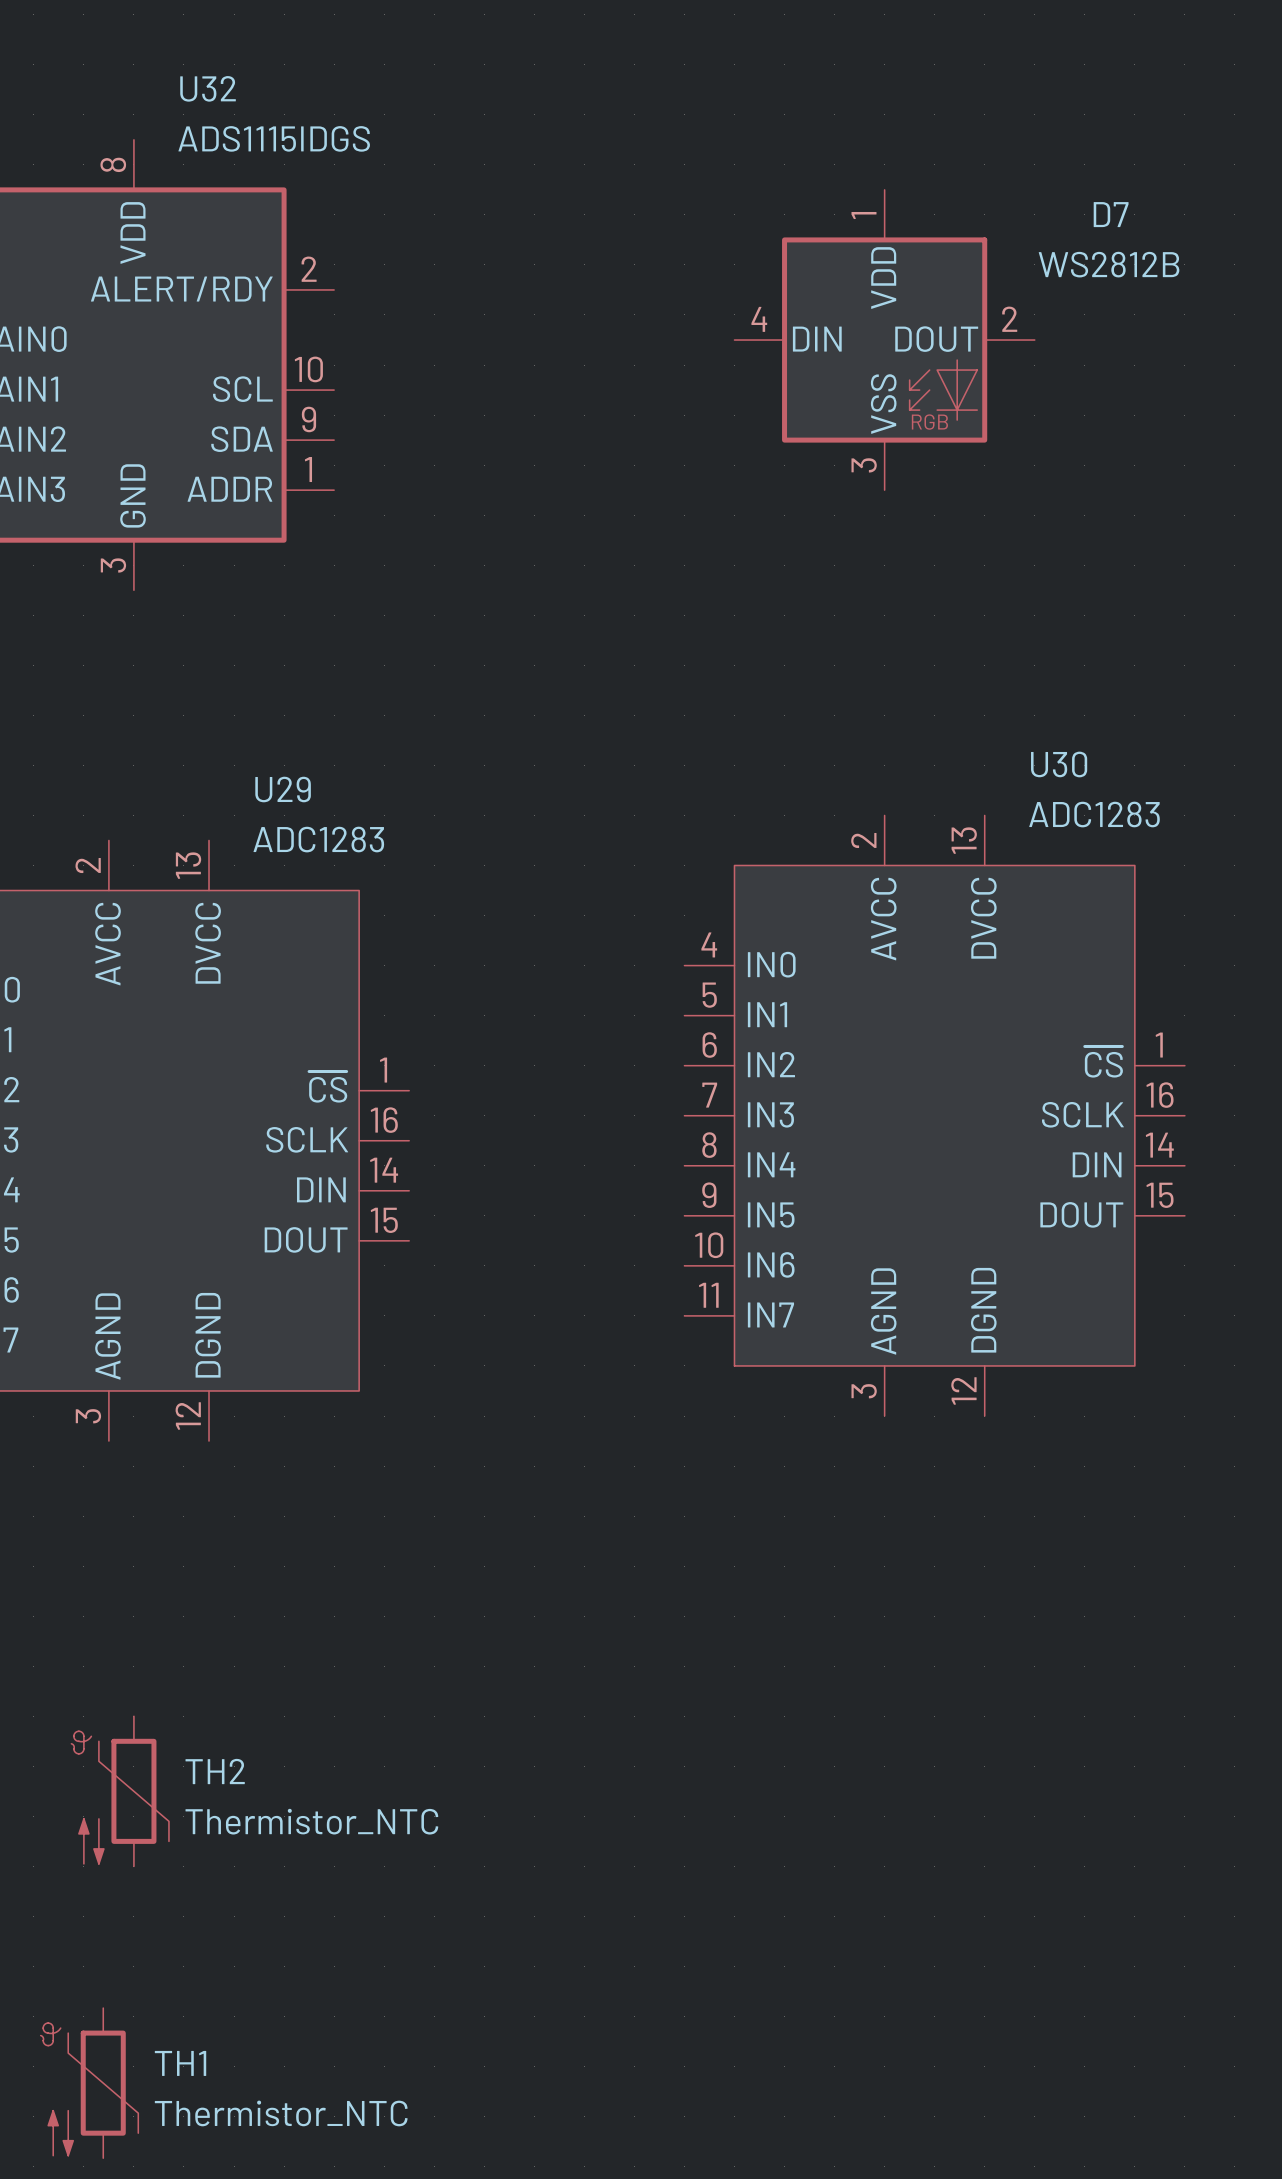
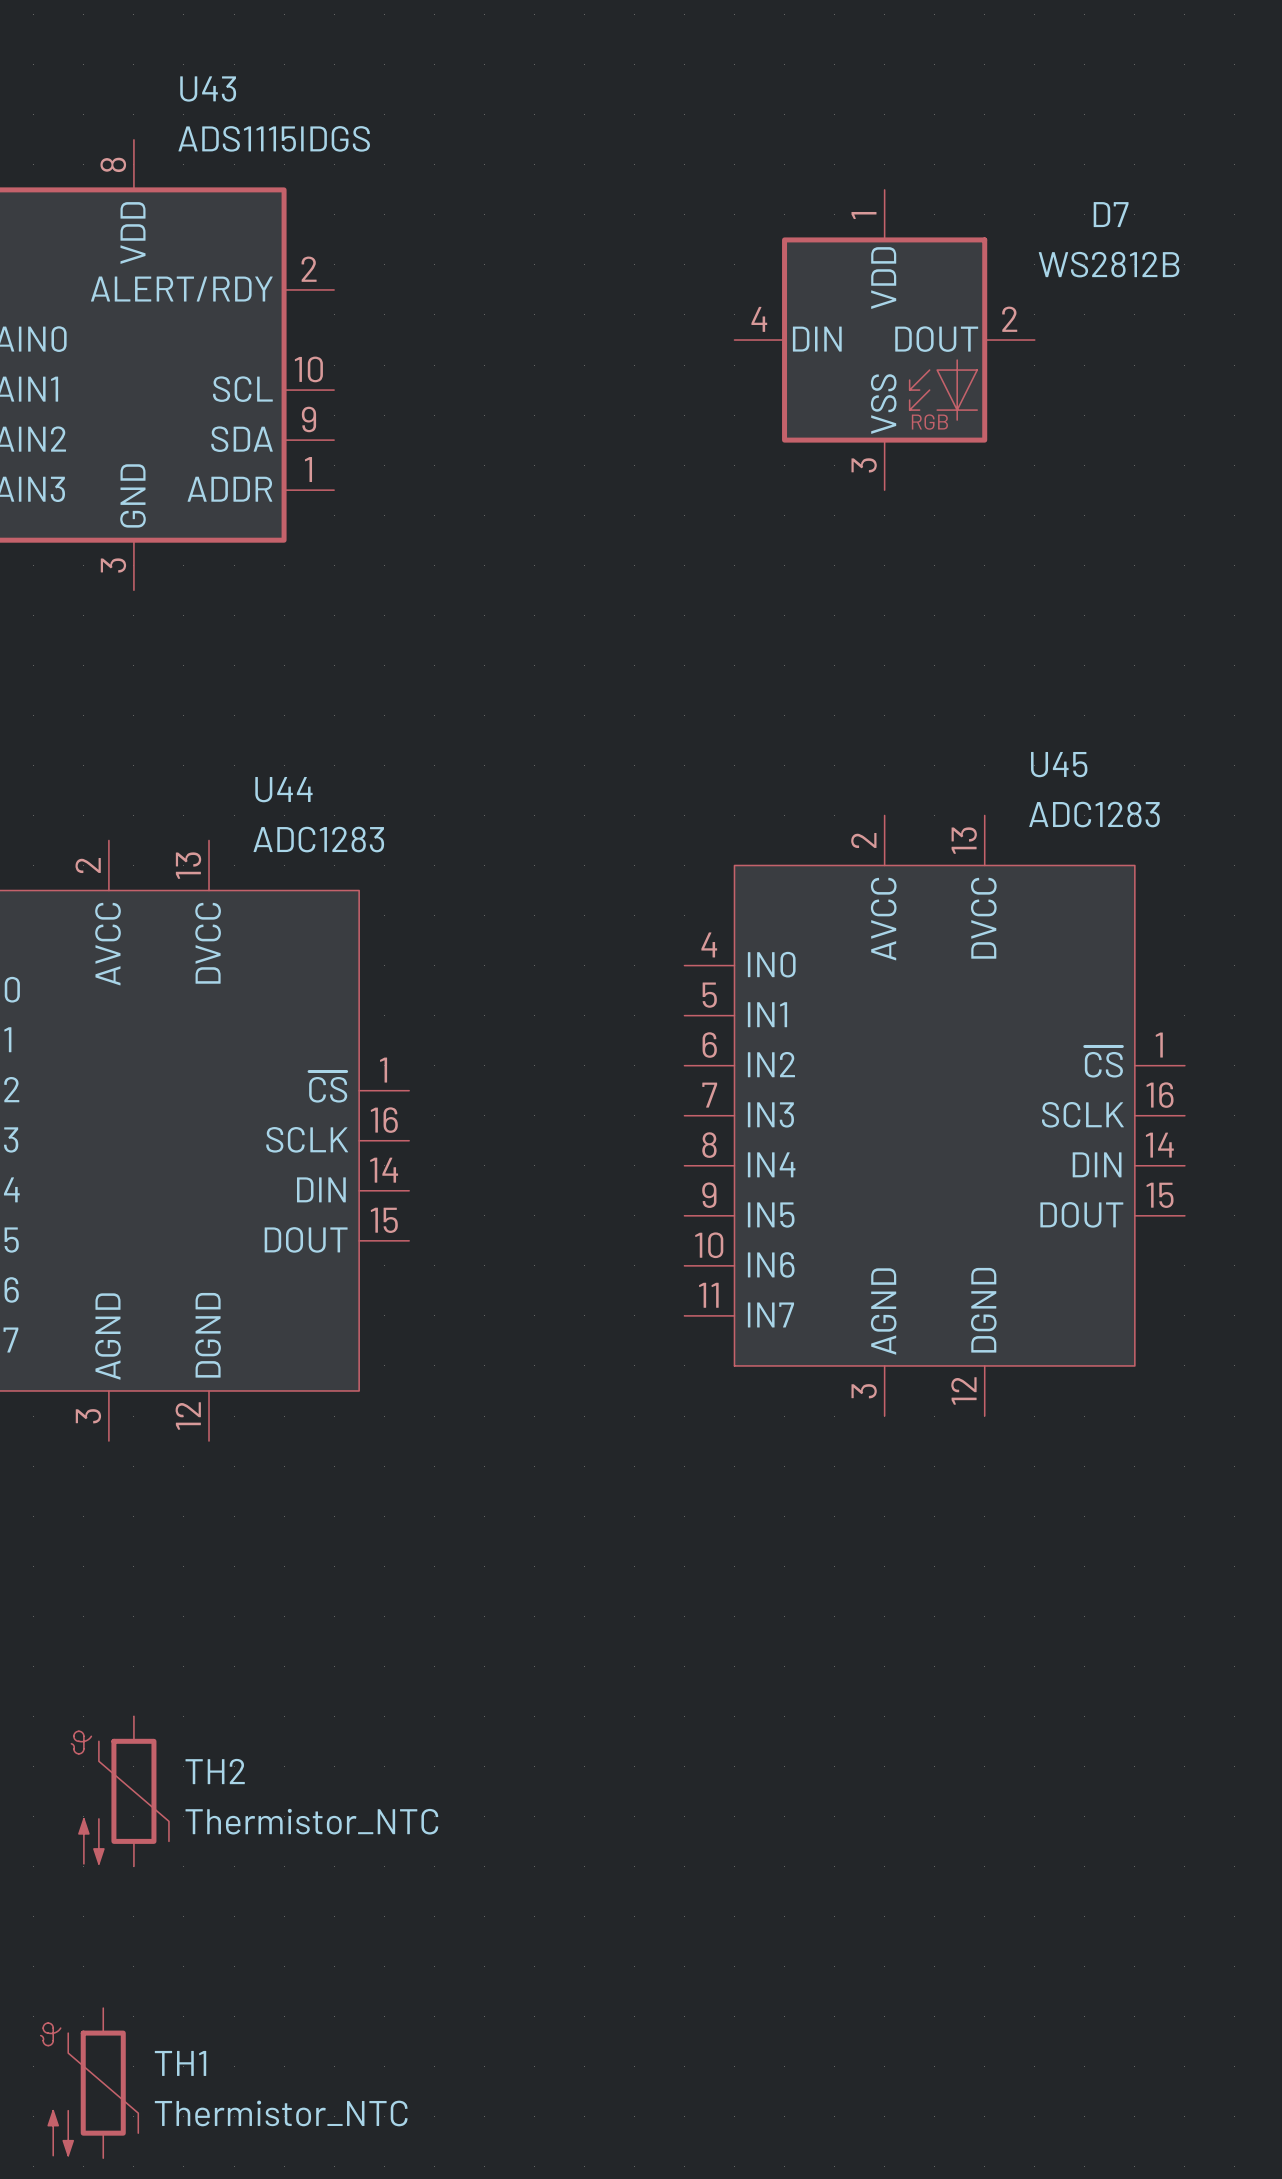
U32 name: U32 (208, 88) -> U43 (208, 88)
U30 name: U30 (1059, 764) -> U45 (1059, 764)
U29 name: U29 (283, 789) -> U44 (283, 789)

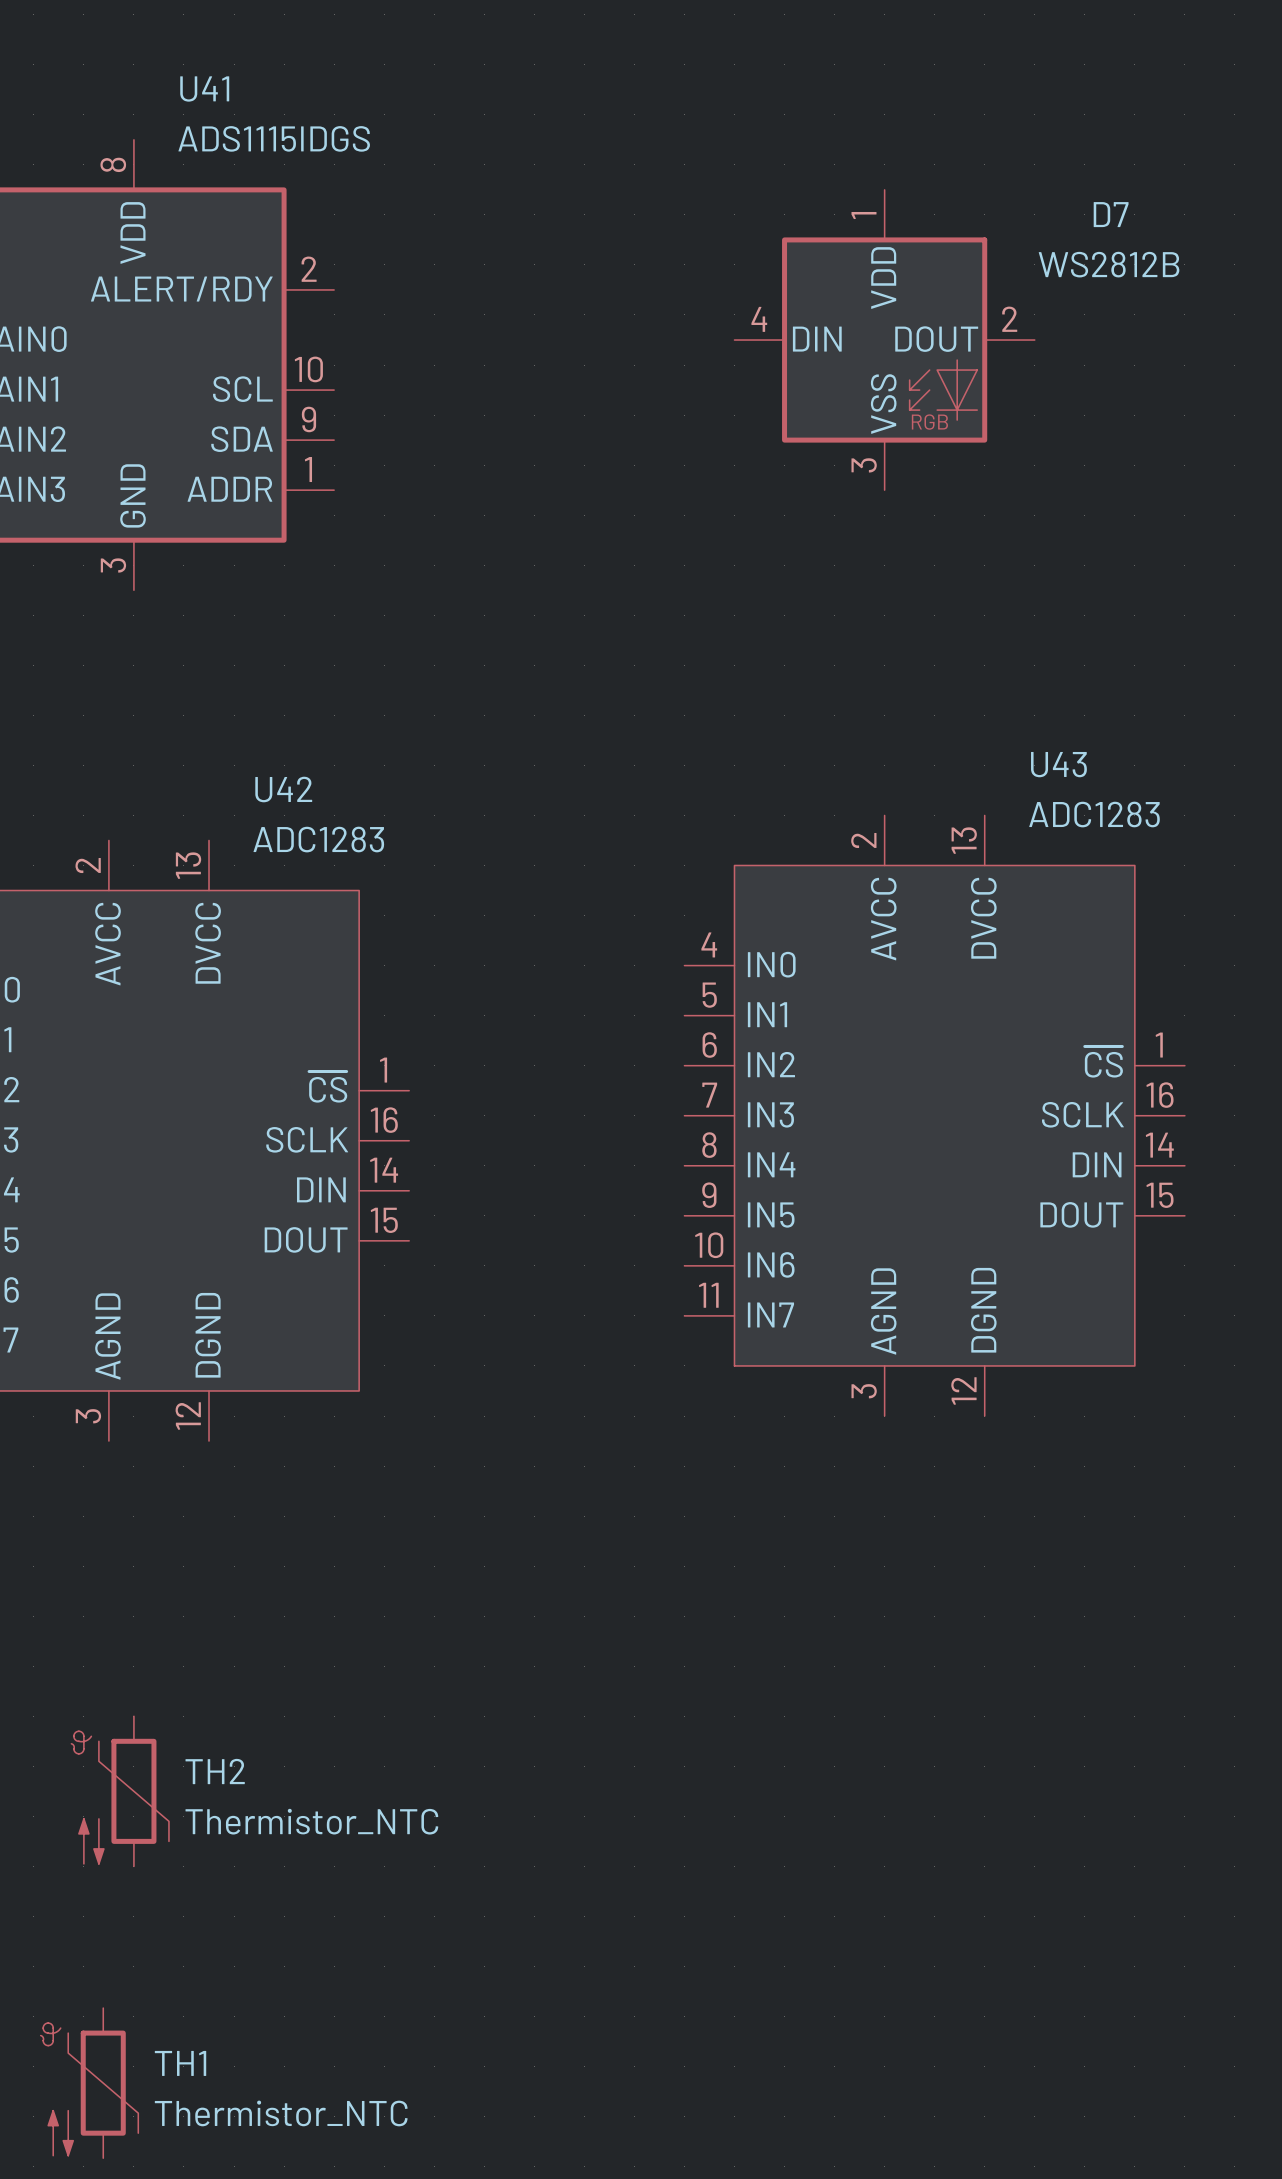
U43 name: U43 (208, 88) -> U41 (204, 88)
U45 name: U45 (1059, 764) -> U43 (1058, 764)
U44 name: U44 (283, 789) -> U42 (283, 789)

